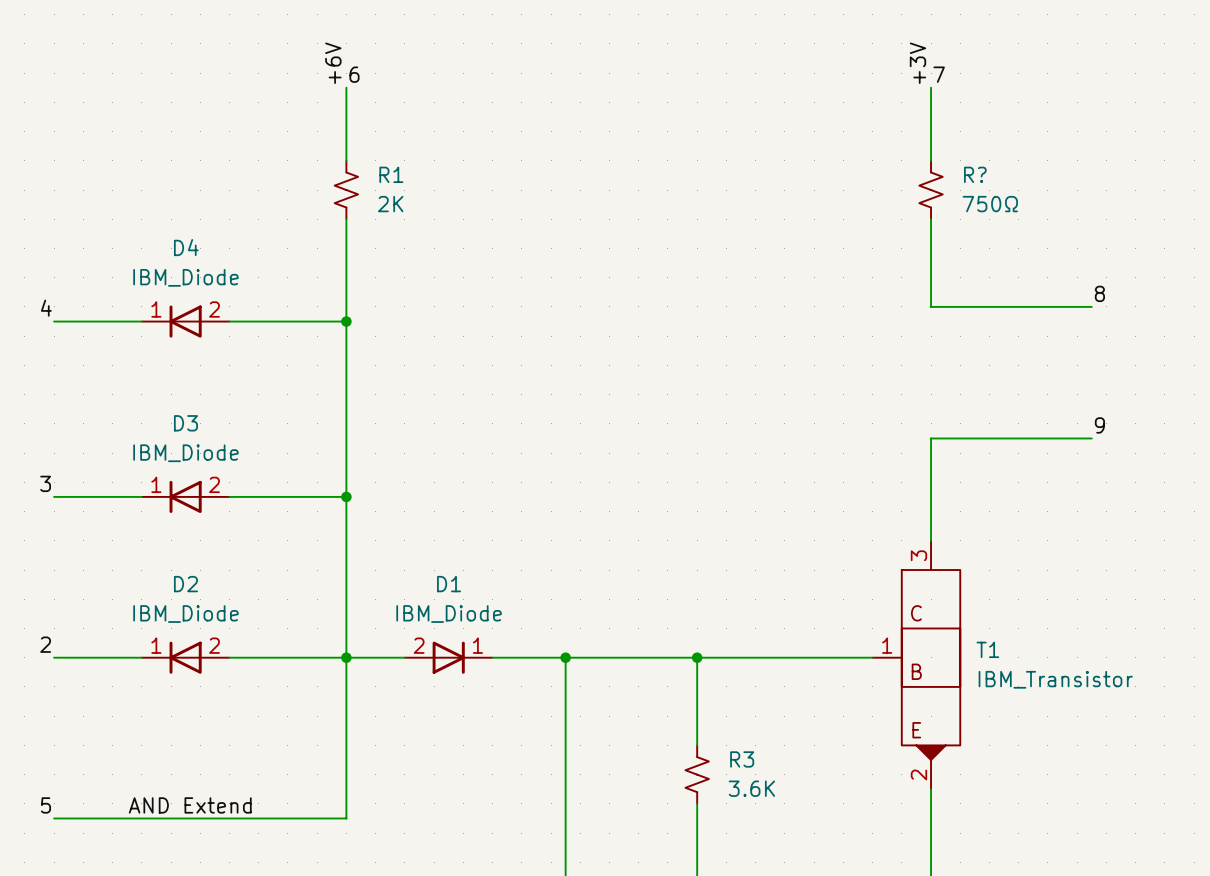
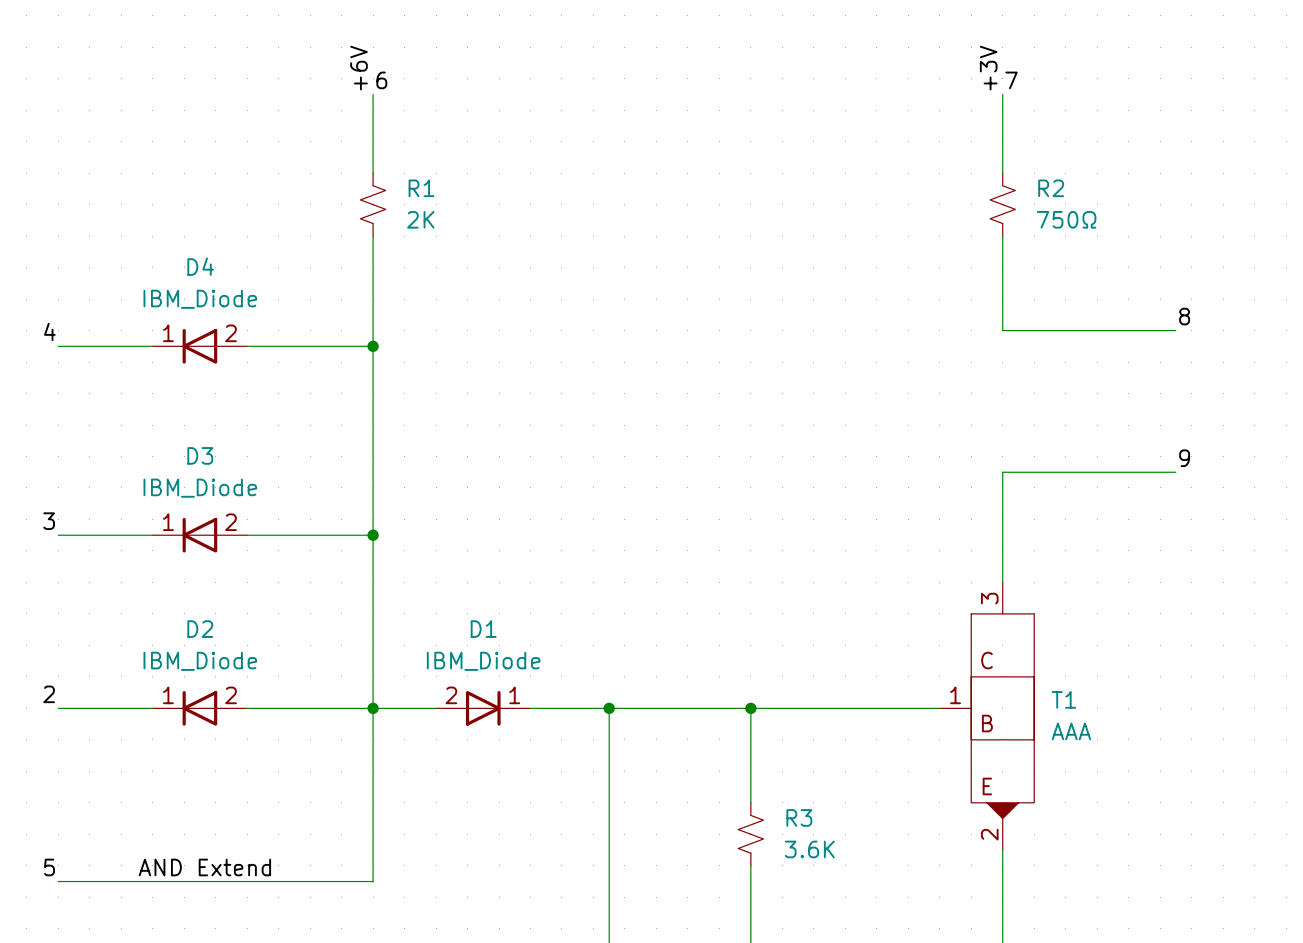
R? name: R? (975, 174) -> R2 (1051, 188)
T1 value: IBM_Transistor (1055, 679) -> AAA (1071, 731)

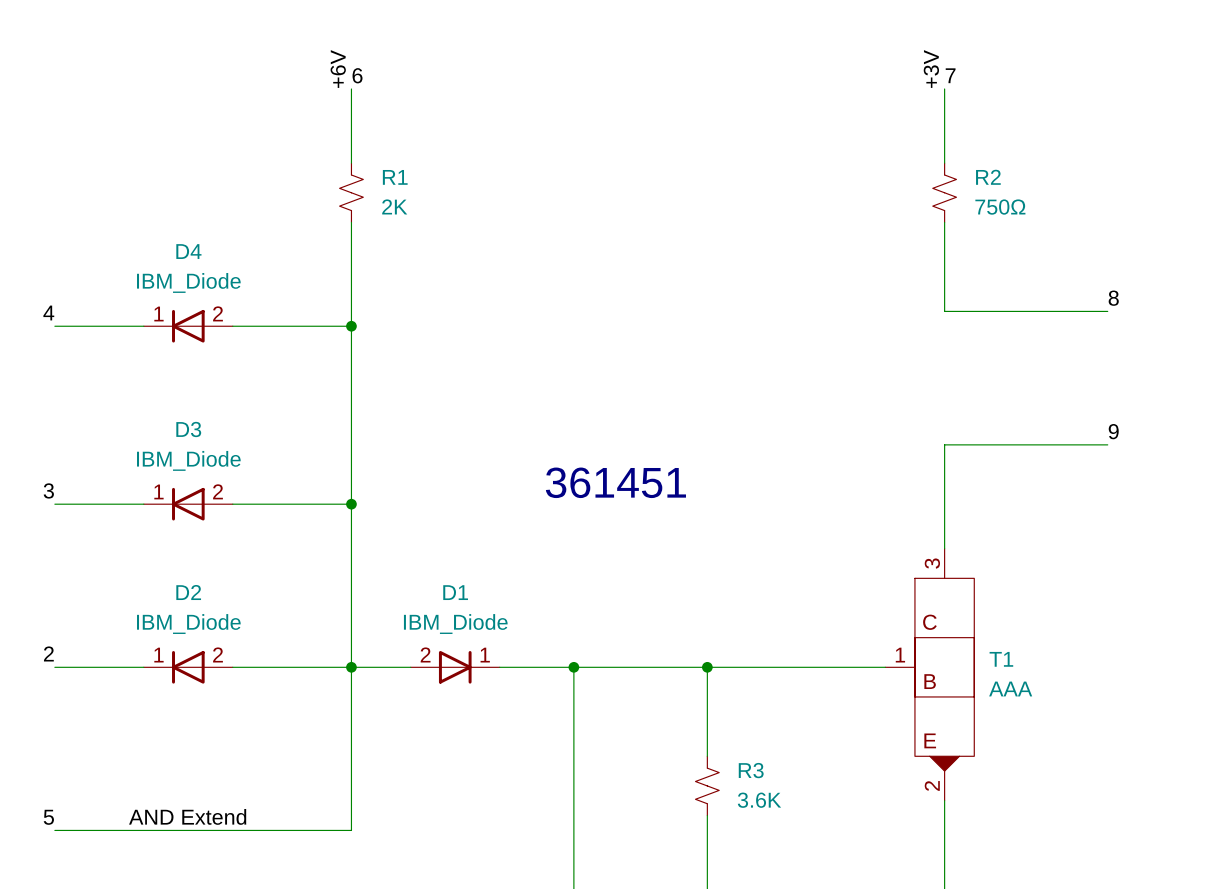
text: none -> 361451 (615, 482)

